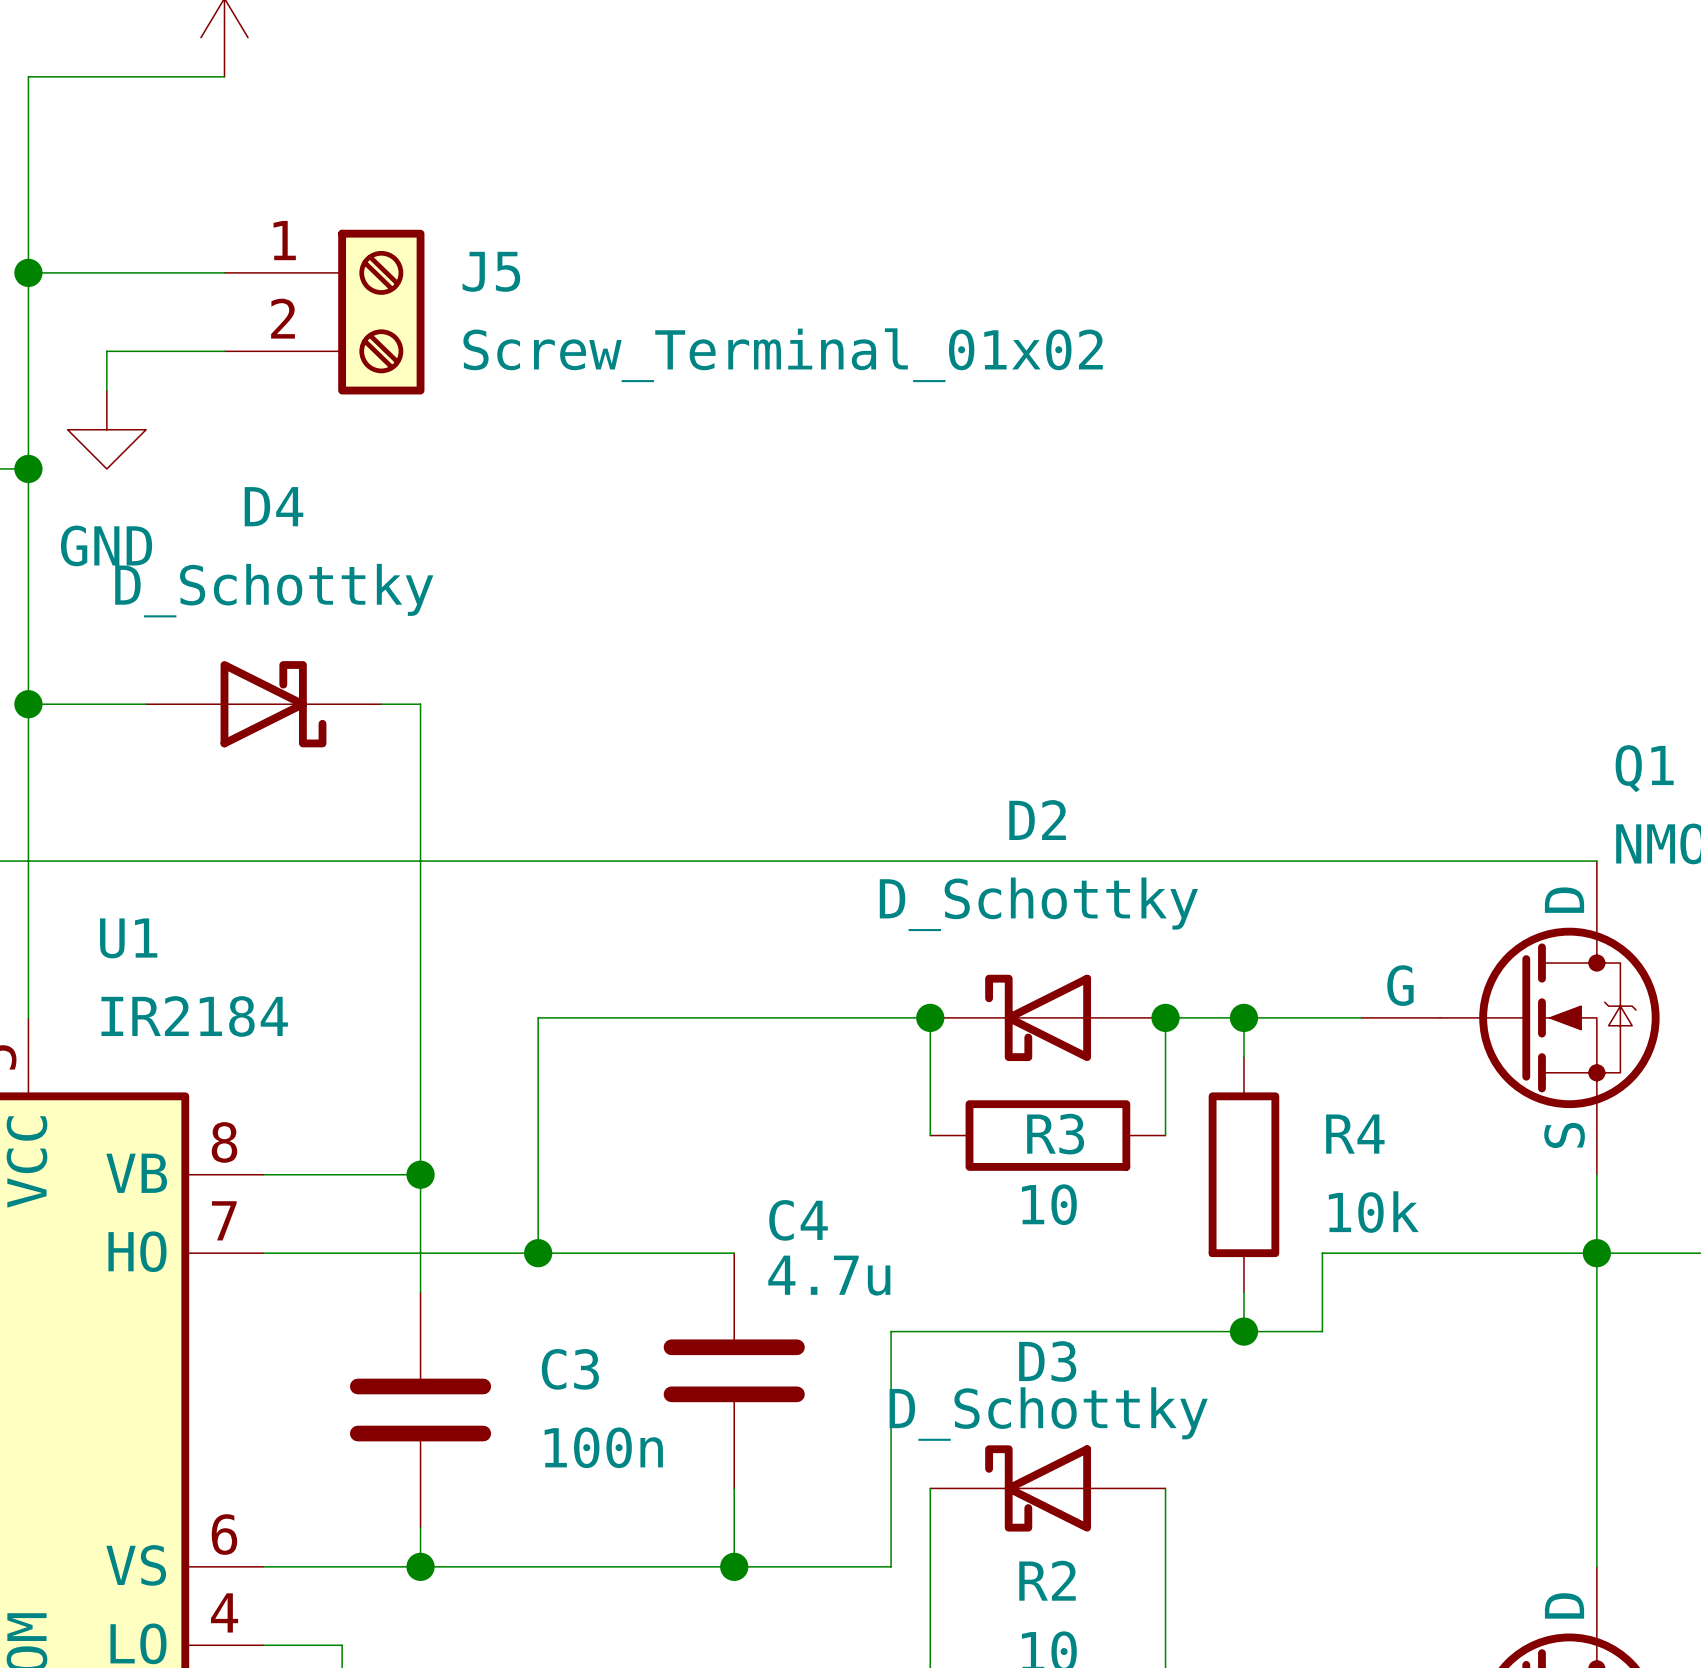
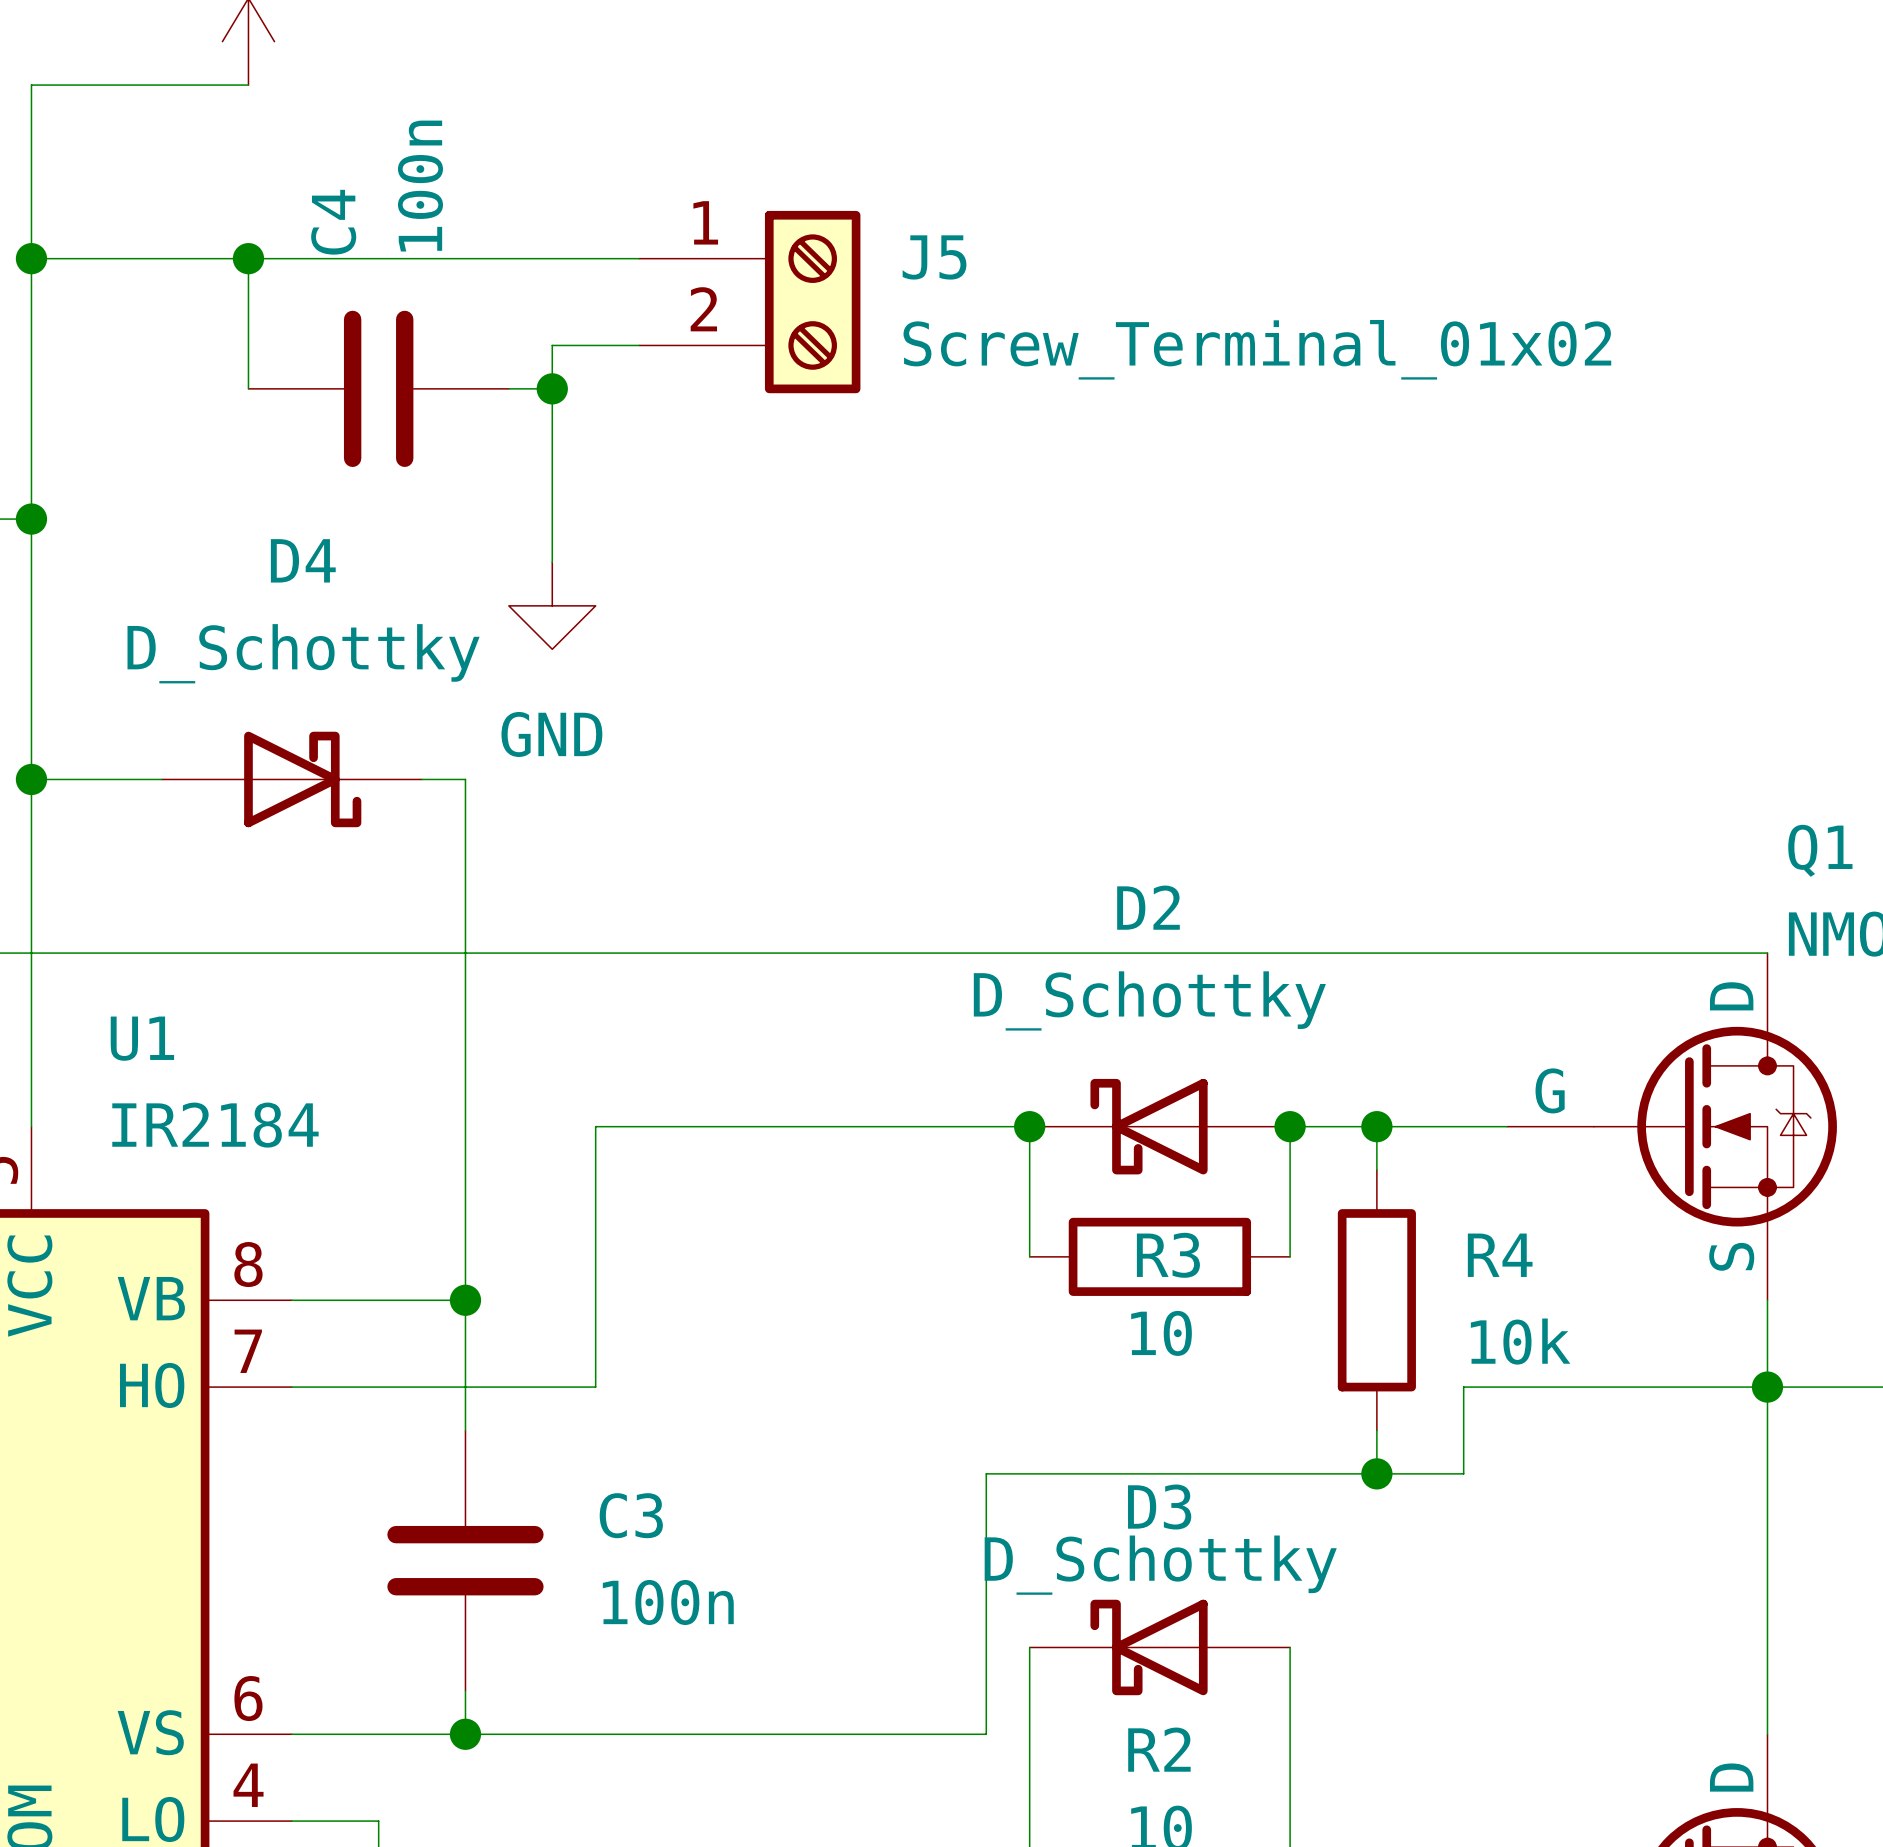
wire: none -> (31, 258) (639, 258)
junction: none -> (248, 258)
wire: (28, 272) (224, 272) -> none
junction position: (28, 272) -> (31, 258)
J5 position: (324, 312) -> (749, 302)
wire: none -> (639, 345) (552, 345) (552, 562)
wire: (224, 351) (106, 351) (106, 390) -> (248, 388) (248, 258)
wire: none -> (508, 388) (552, 388)
junction: none -> (552, 388)
power symbol position: GND (106, 429) -> GND (552, 605)
C4 name position: C4 (798, 1220) -> C4 (333, 222)
wire: (538, 1253) (734, 1253) -> none
junction: (538, 1253) -> none
C4 value: 4.7u (829, 1275) -> 100n (420, 186)
C4 rotation: 0° (734, 1370) -> 90° clockwise (378, 388)
C4 position: (734, 1370) -> (378, 388)
wire: (734, 1488) (734, 1566) -> none
junction: (734, 1566) -> none

